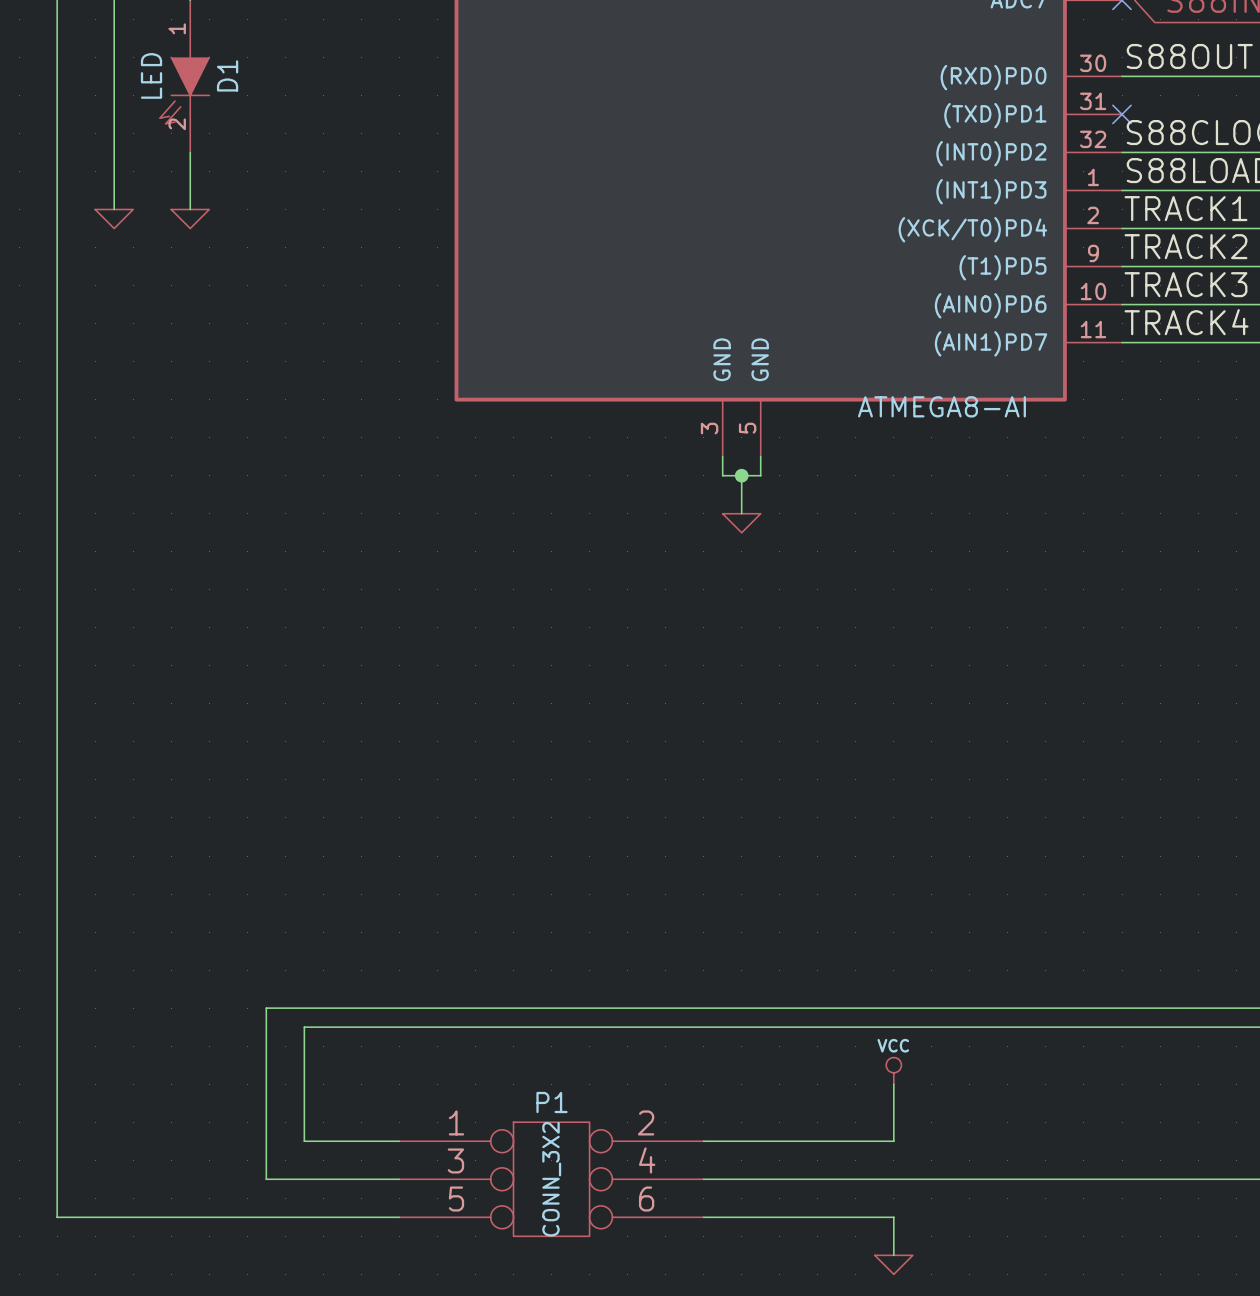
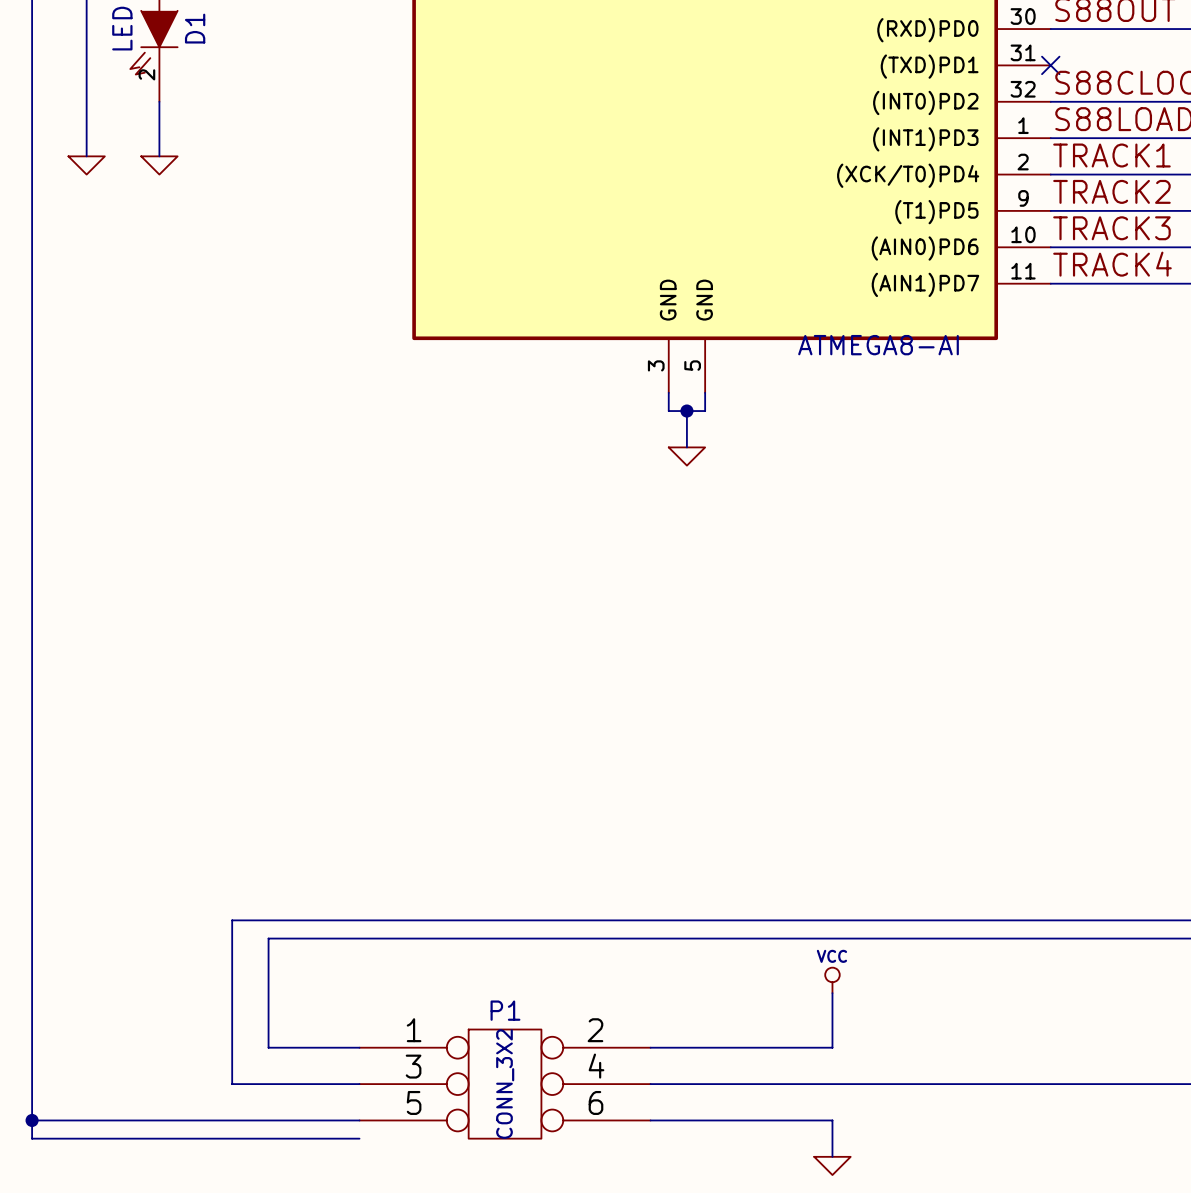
wire: none -> (32, 1120) (32, 1138) (359, 1138)
junction: none -> (32, 1120)

